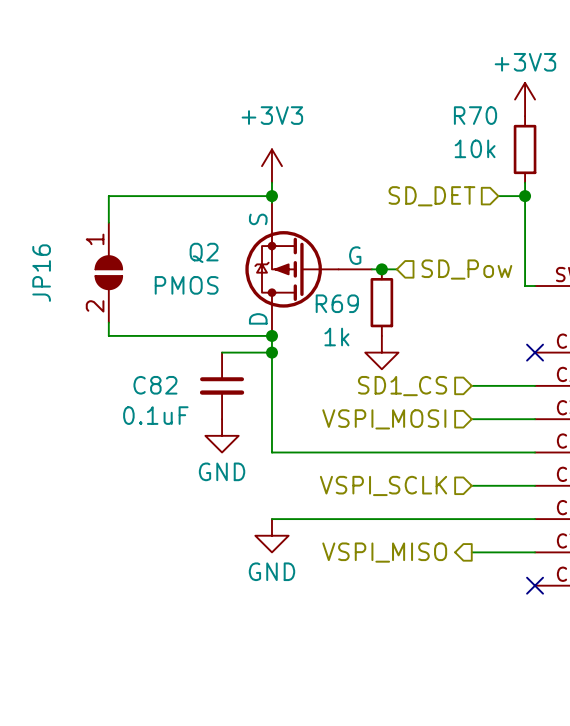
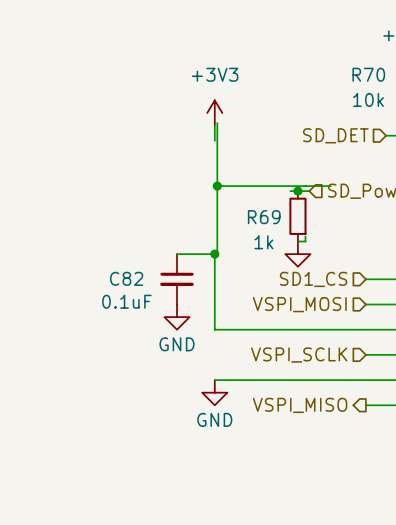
wire: (271, 196) (108, 196) (108, 222) -> none
junction: (271, 196) -> none
wire: none -> (217, 186) (330, 186)
junction: none -> (217, 186)
Q2: PMOS (308, 269) -> none
JP16: (108, 272) -> none
wire: (108, 322) (108, 335) (271, 335) (271, 352) -> (217, 123) (217, 254) (214, 254)
wire: none -> (305, 236) (305, 241) (297, 241)
junction: (271, 335) -> none

